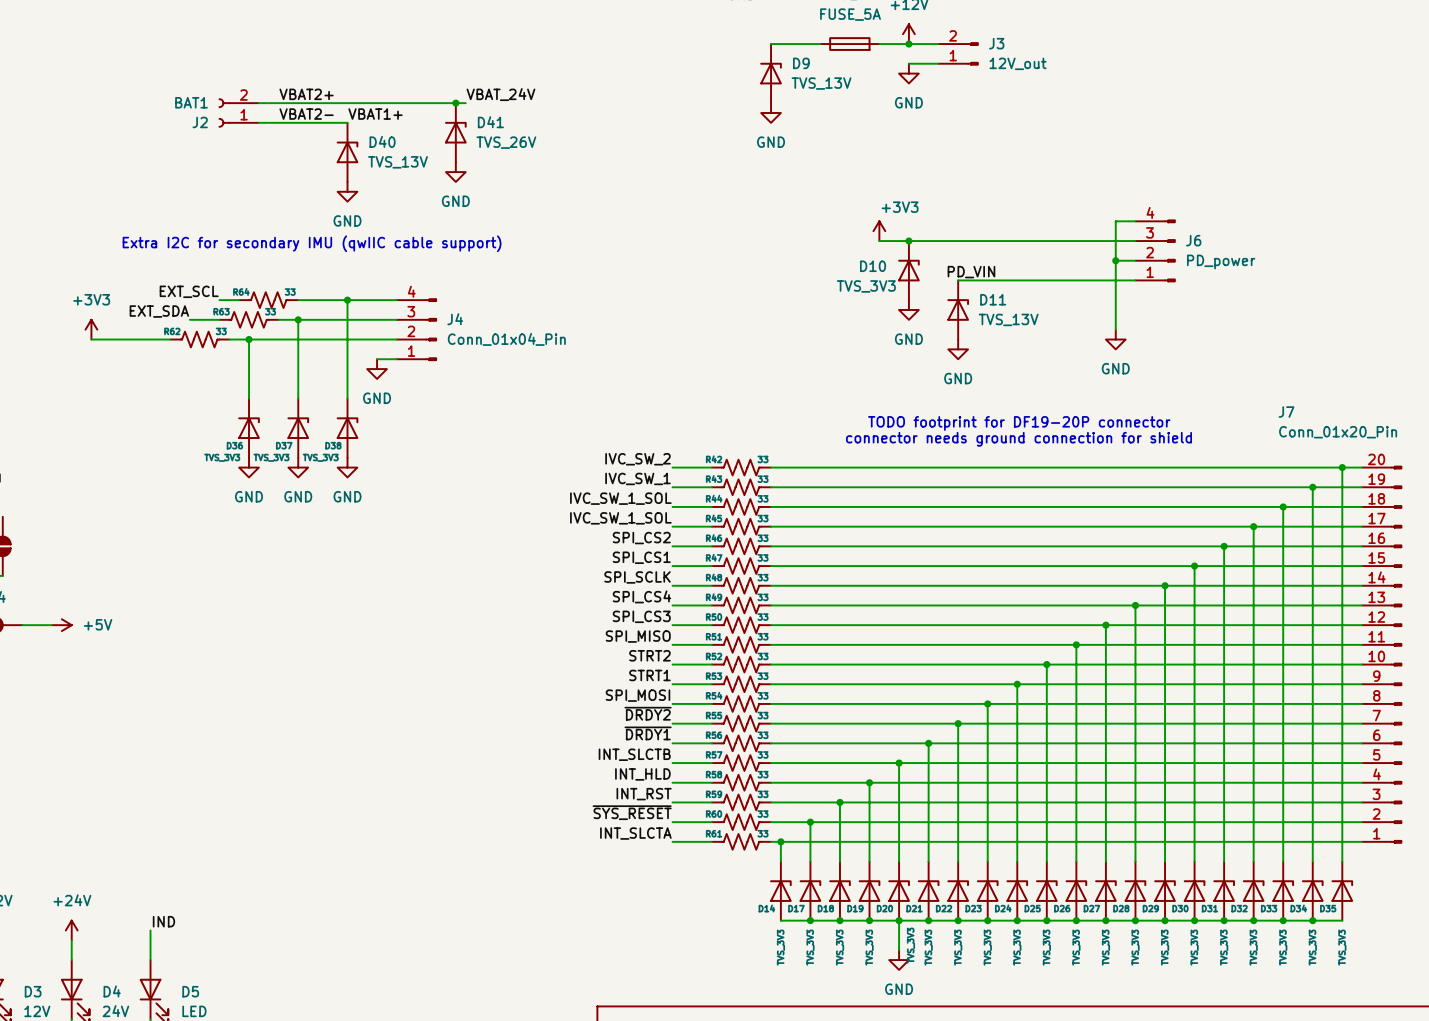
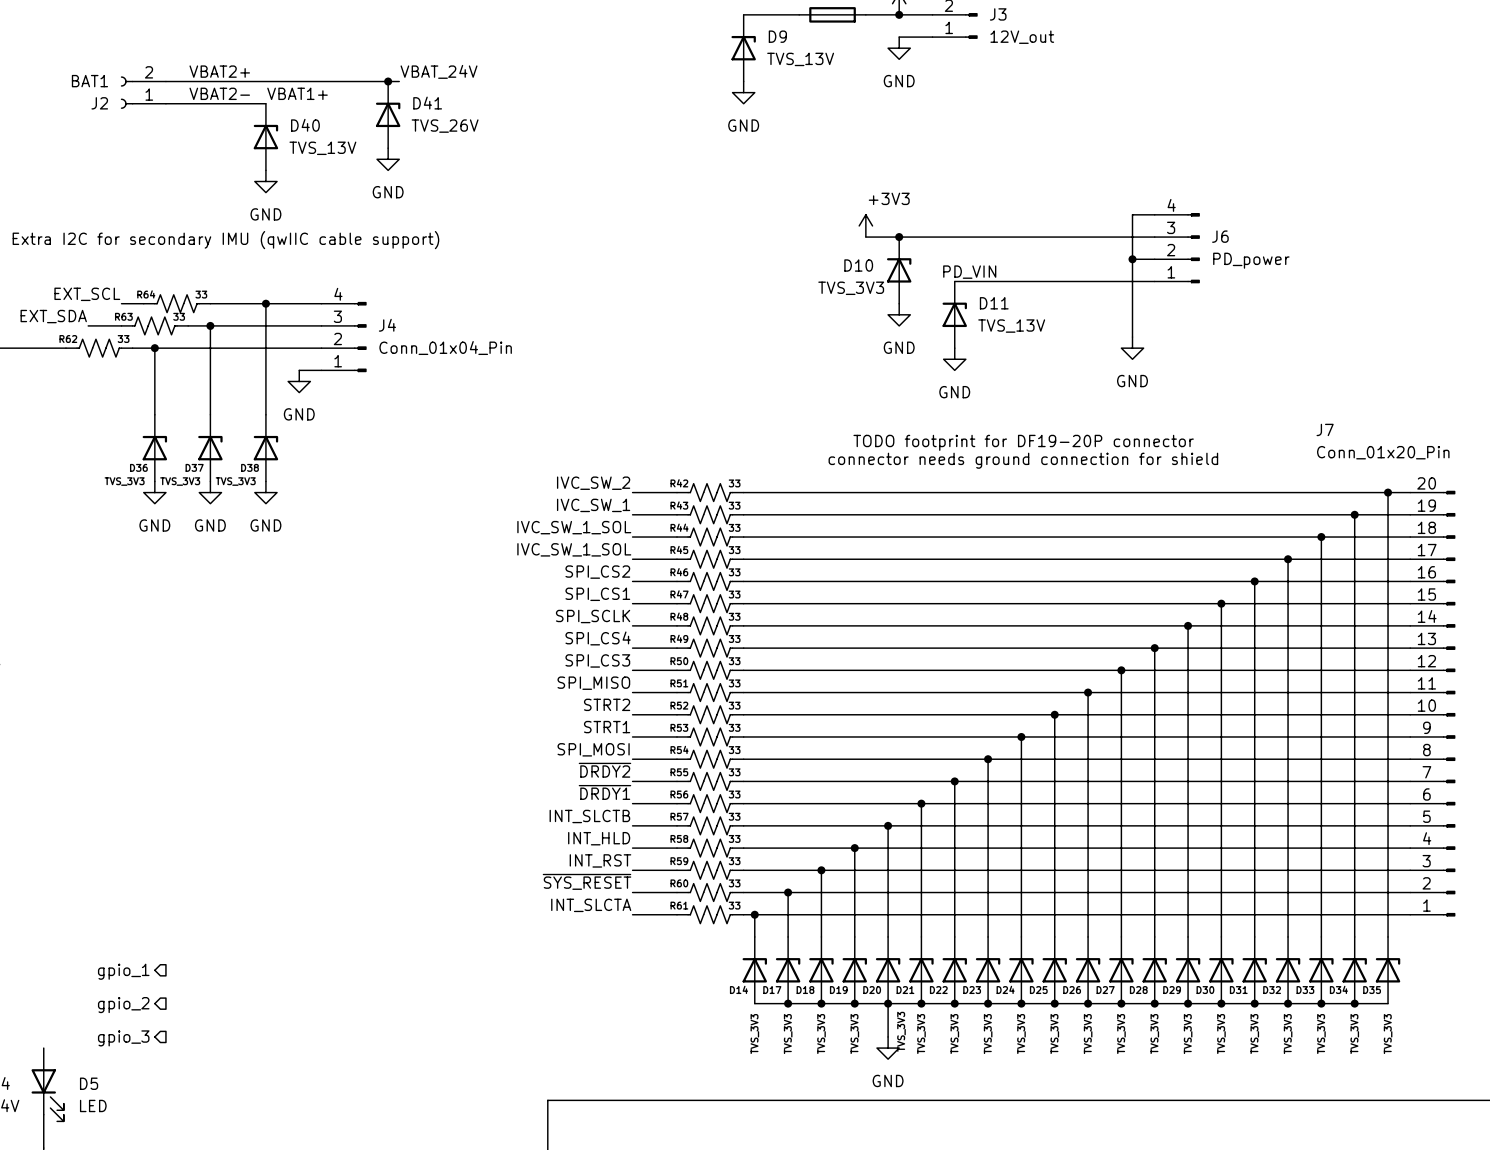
sheet pin: none -> gpio_1 (123, 971)
label: IND (163, 921) -> none
sheet pin: none -> gpio_2 (123, 1005)
wire: (150, 930) (150, 960) -> none
sheet pin: none -> gpio_3 (123, 1038)

